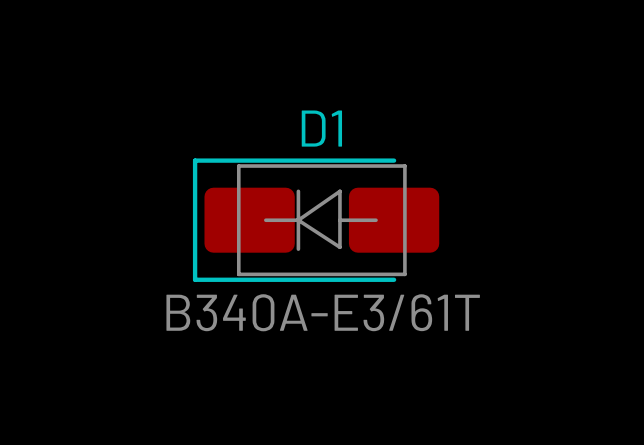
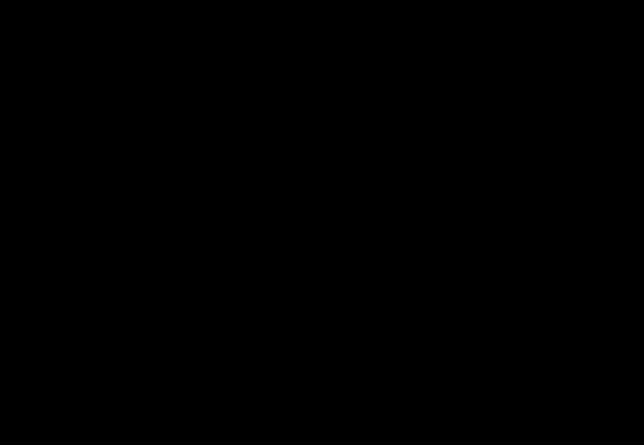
D1: B340A-E3/61T (316, 220) -> none

